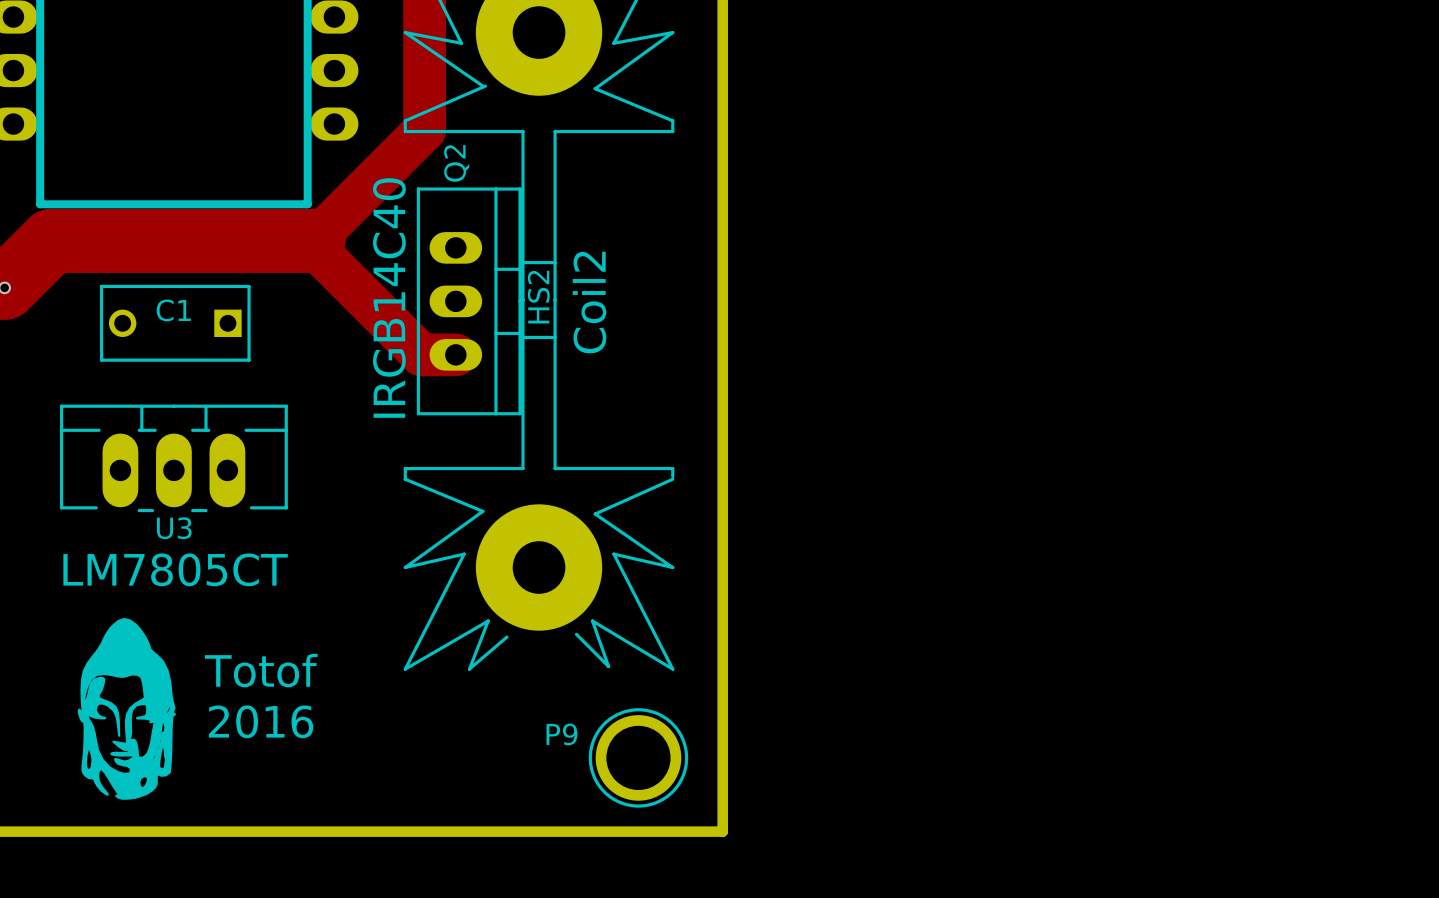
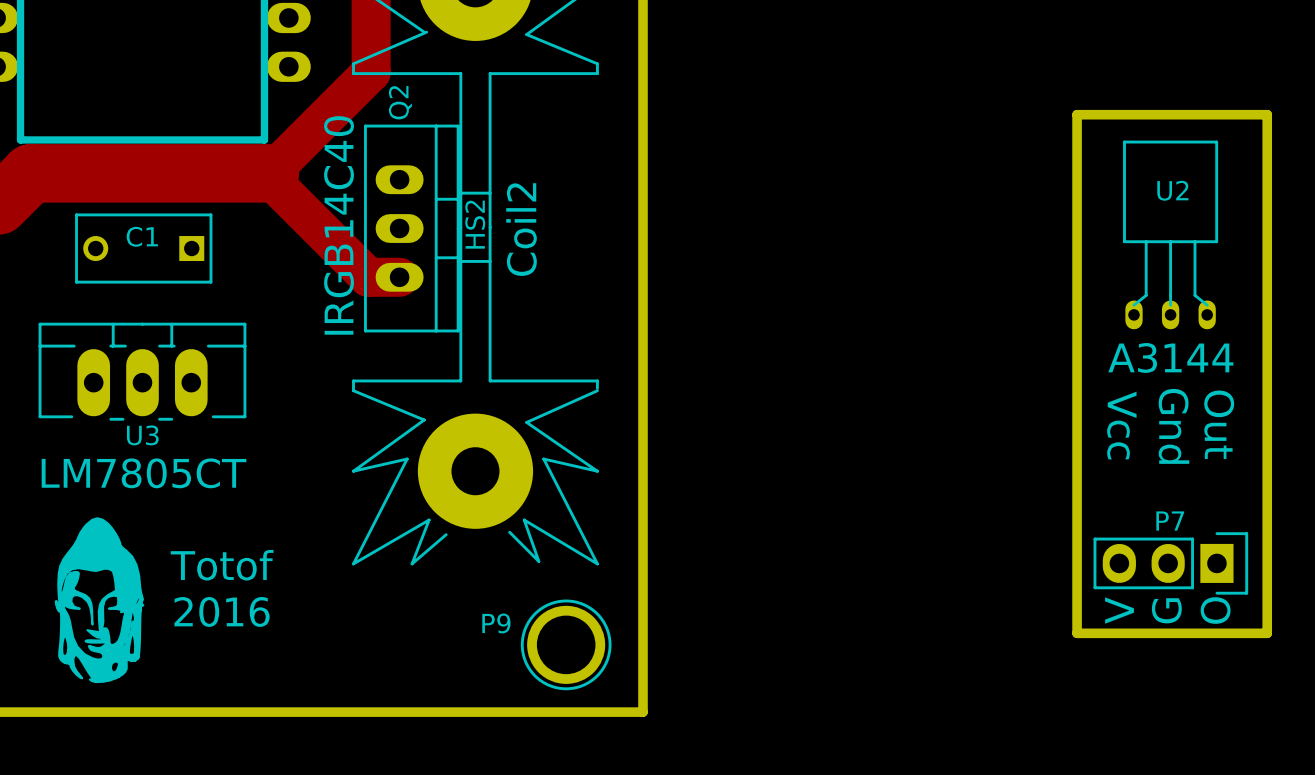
board edge: none -> (1077, 114) (1077, 633) (1267, 633) (1267, 114) (1077, 114)
U2: none -> (1170, 234)
text: none -> A3144 (1170, 357)
text: none -> Out (1219, 424)
text: none -> Vcc (1121, 425)
text: none -> Gnd (1173, 426)
P7: none -> (1170, 563)
text: none -> V (1119, 610)
text: none -> G (1166, 610)
text: none -> O (1215, 610)

